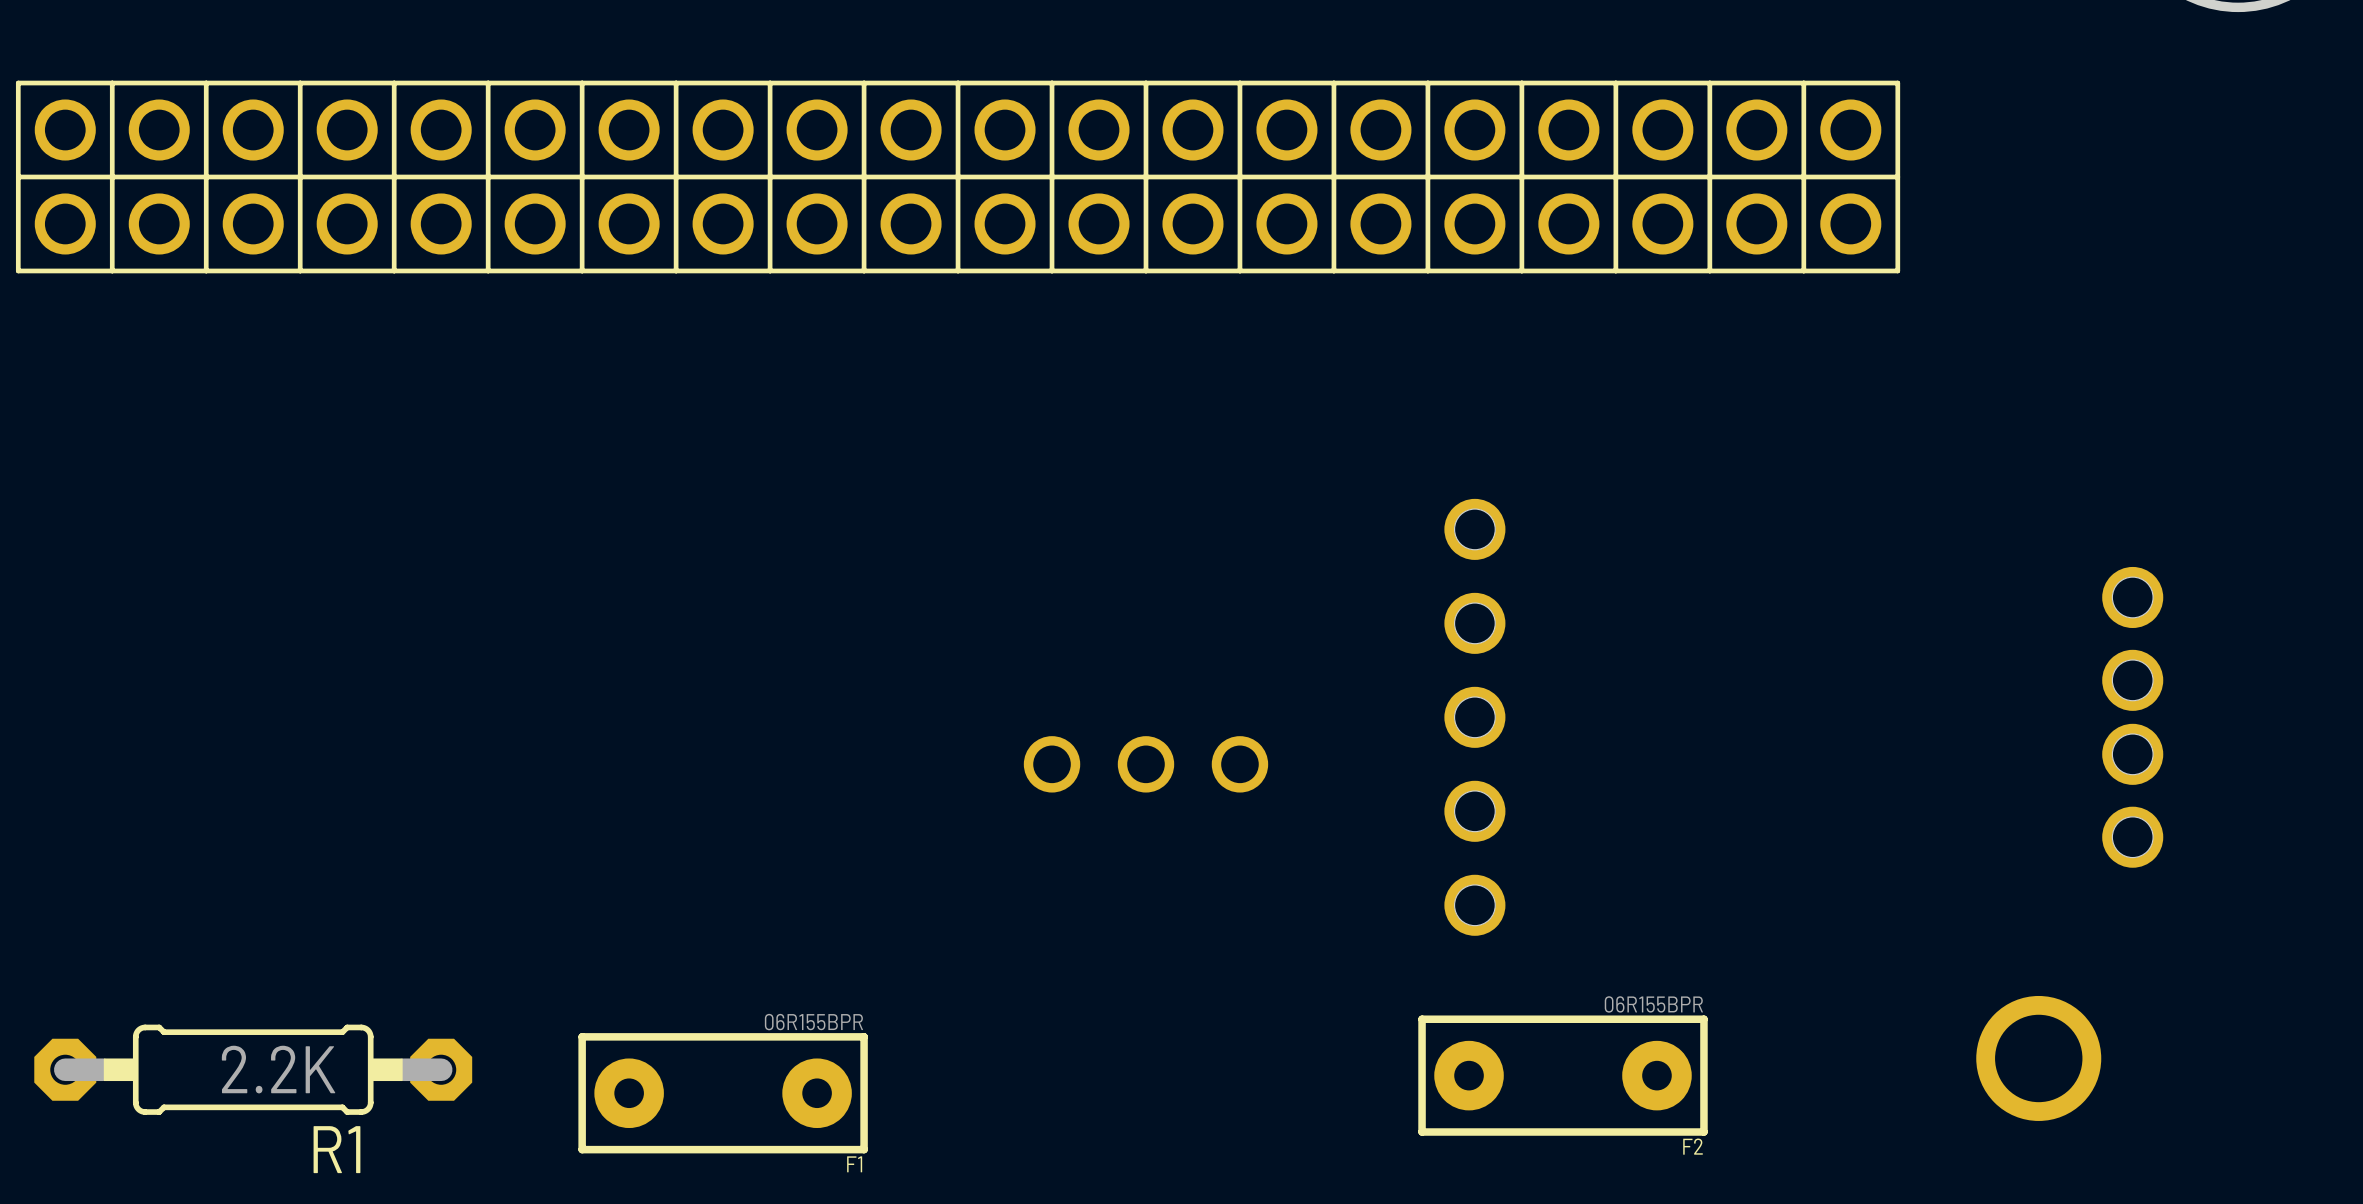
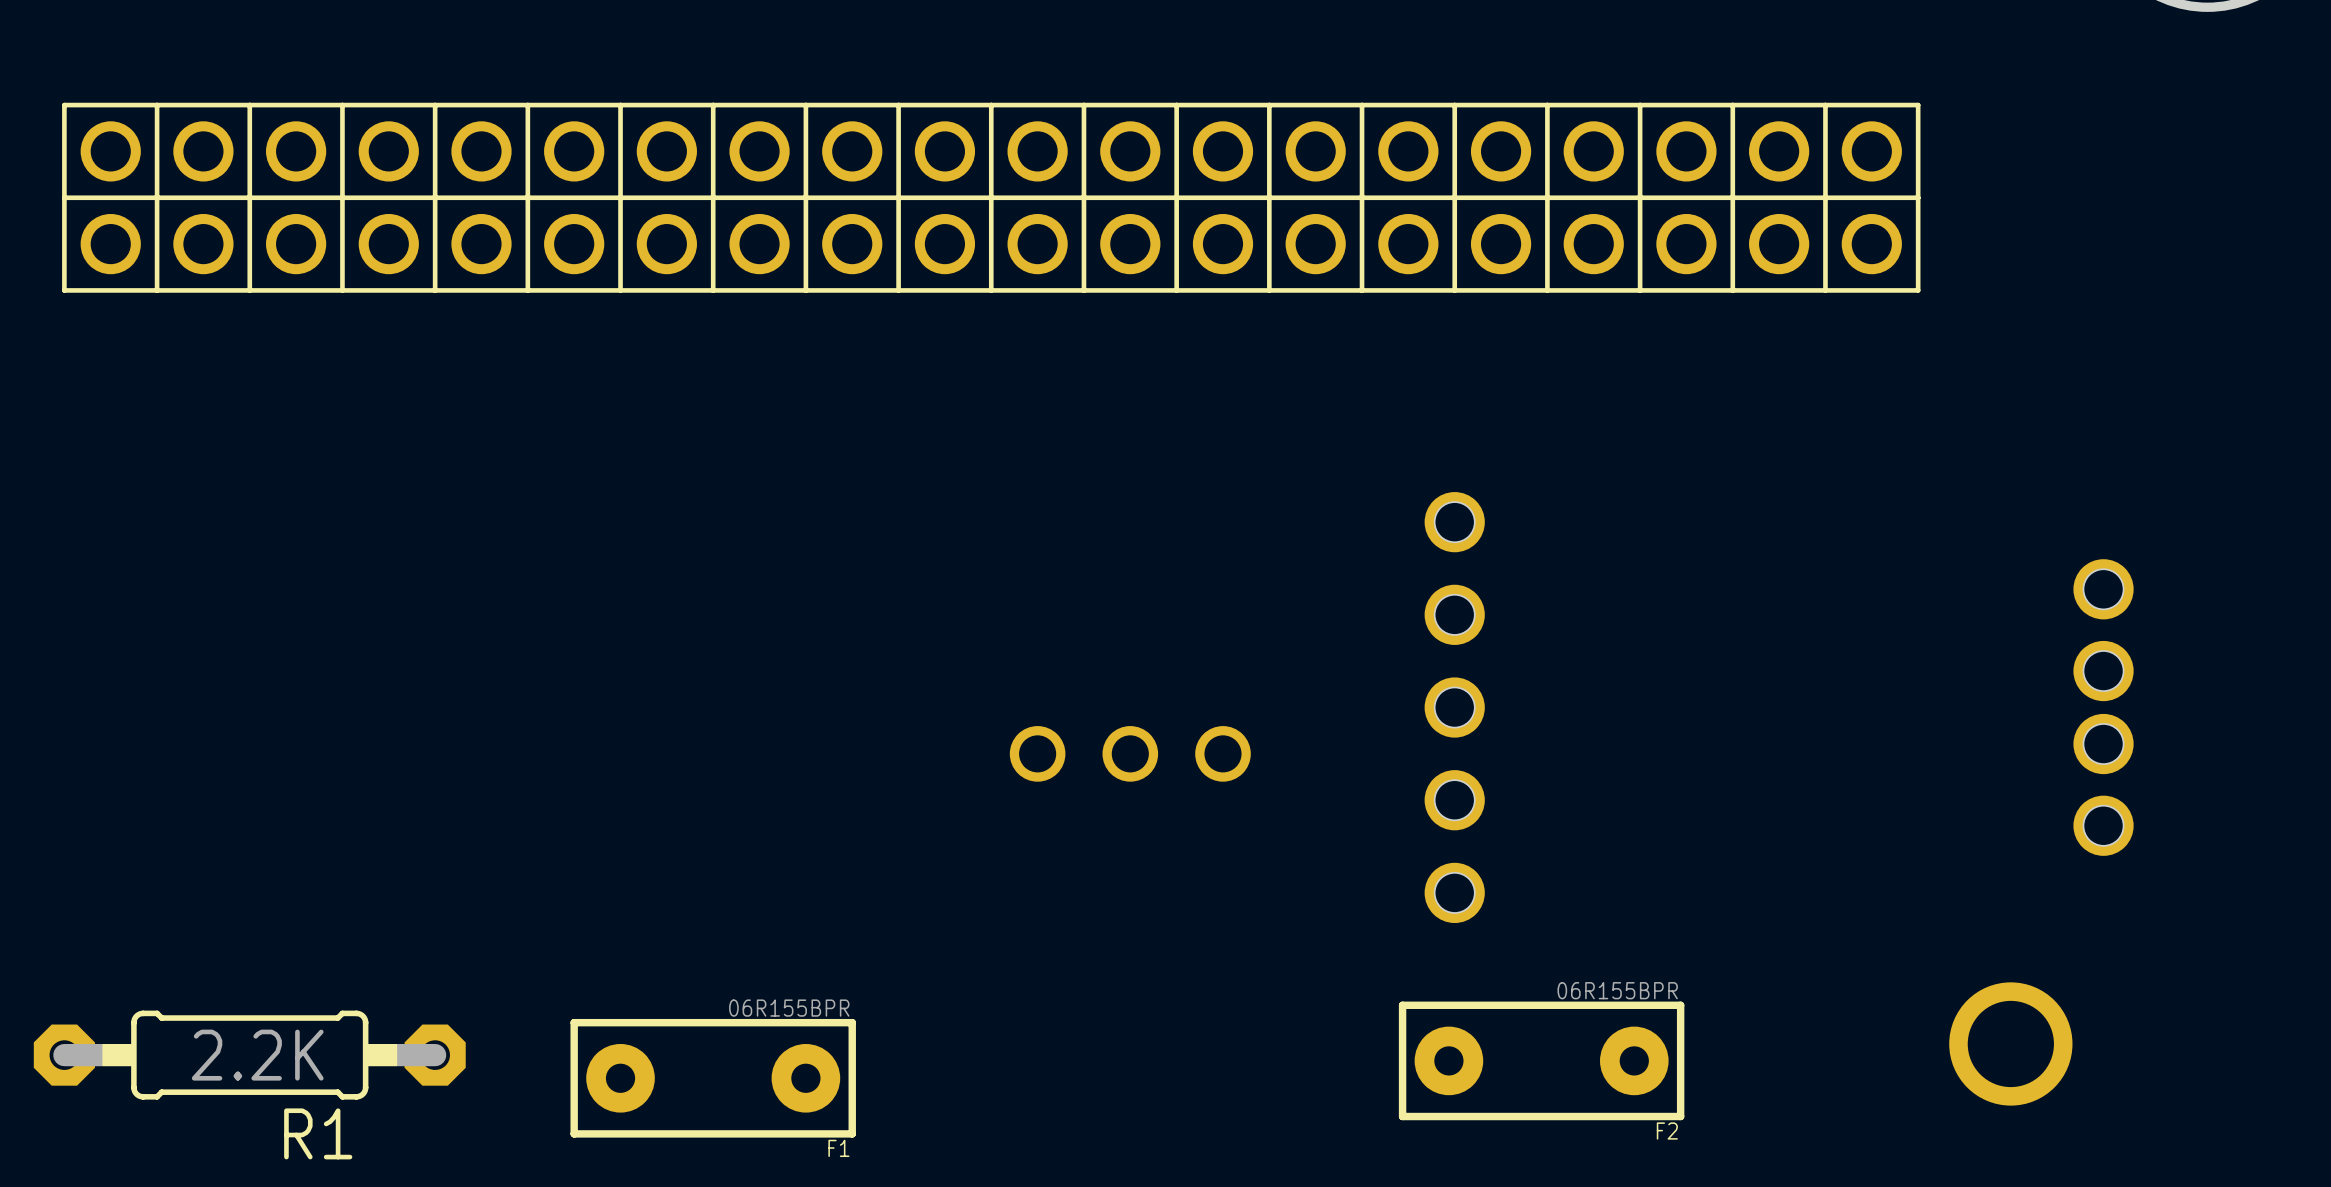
part position: (958, 177) -> (991, 197)

